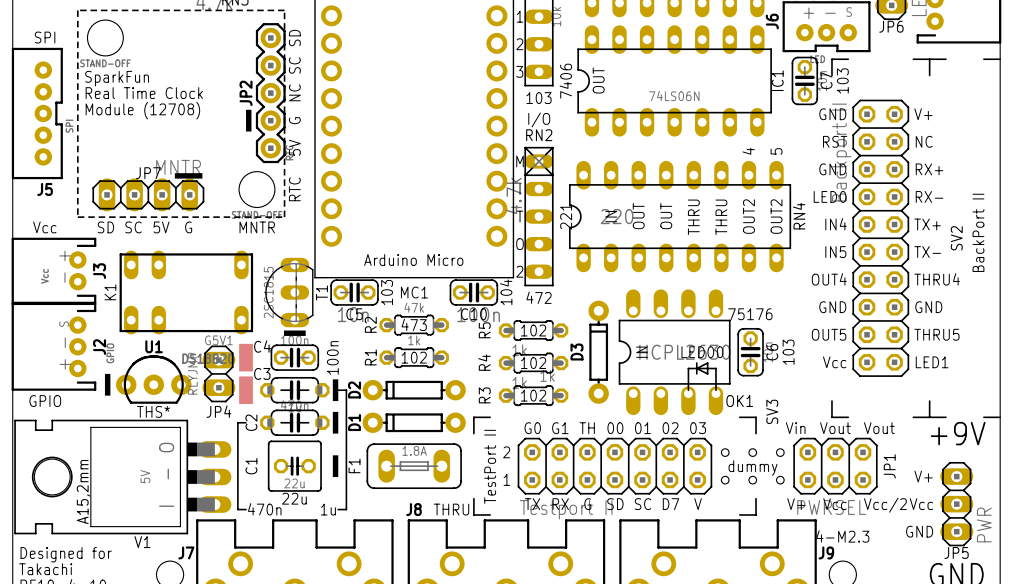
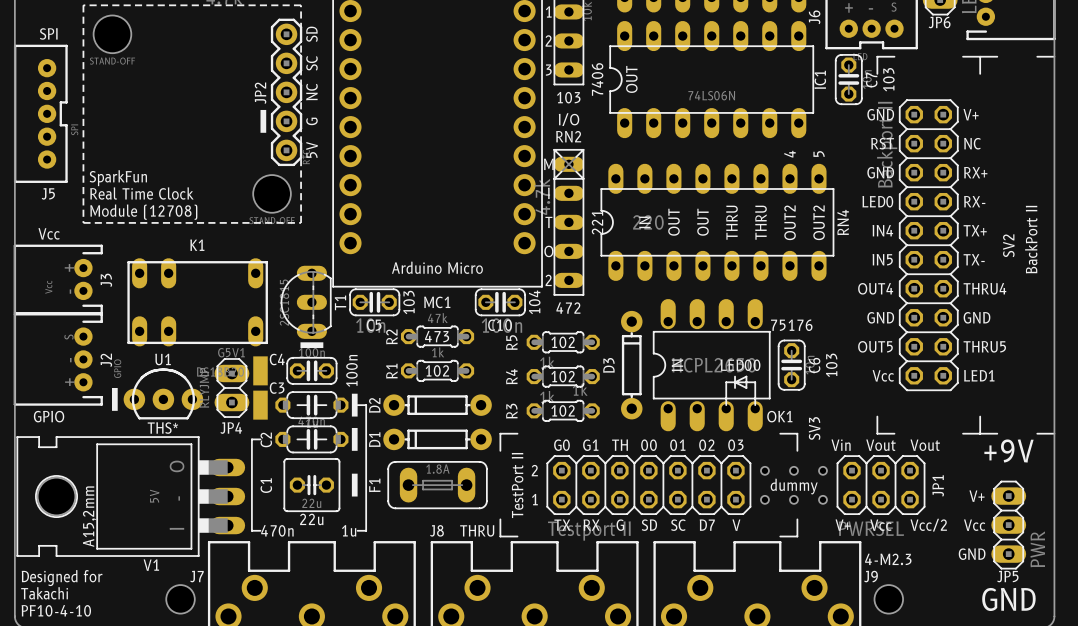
text position: SparkFun (117, 78) -> SparkFun (118, 178)
text position: Real Time Clock (144, 93) -> Real Time Clock (141, 193)
text position: Module (12708) (142, 110) -> Module (12708) (143, 212)
drawing: [174, 173, 203, 179] -> none
text: RTC (294, 189) -> none
JP7: MNTR (148, 194) -> none
text: SD (105, 227) -> none
text: SC (133, 227) -> none
text: 5V (161, 227) -> none
text: G (188, 227) -> none
text: MNTR (257, 227) -> none
K1 name rotation: 0° (110, 292) -> 90° clockwise (197, 245)
K1 name position: K1 (110, 292) -> K1 (197, 245)

